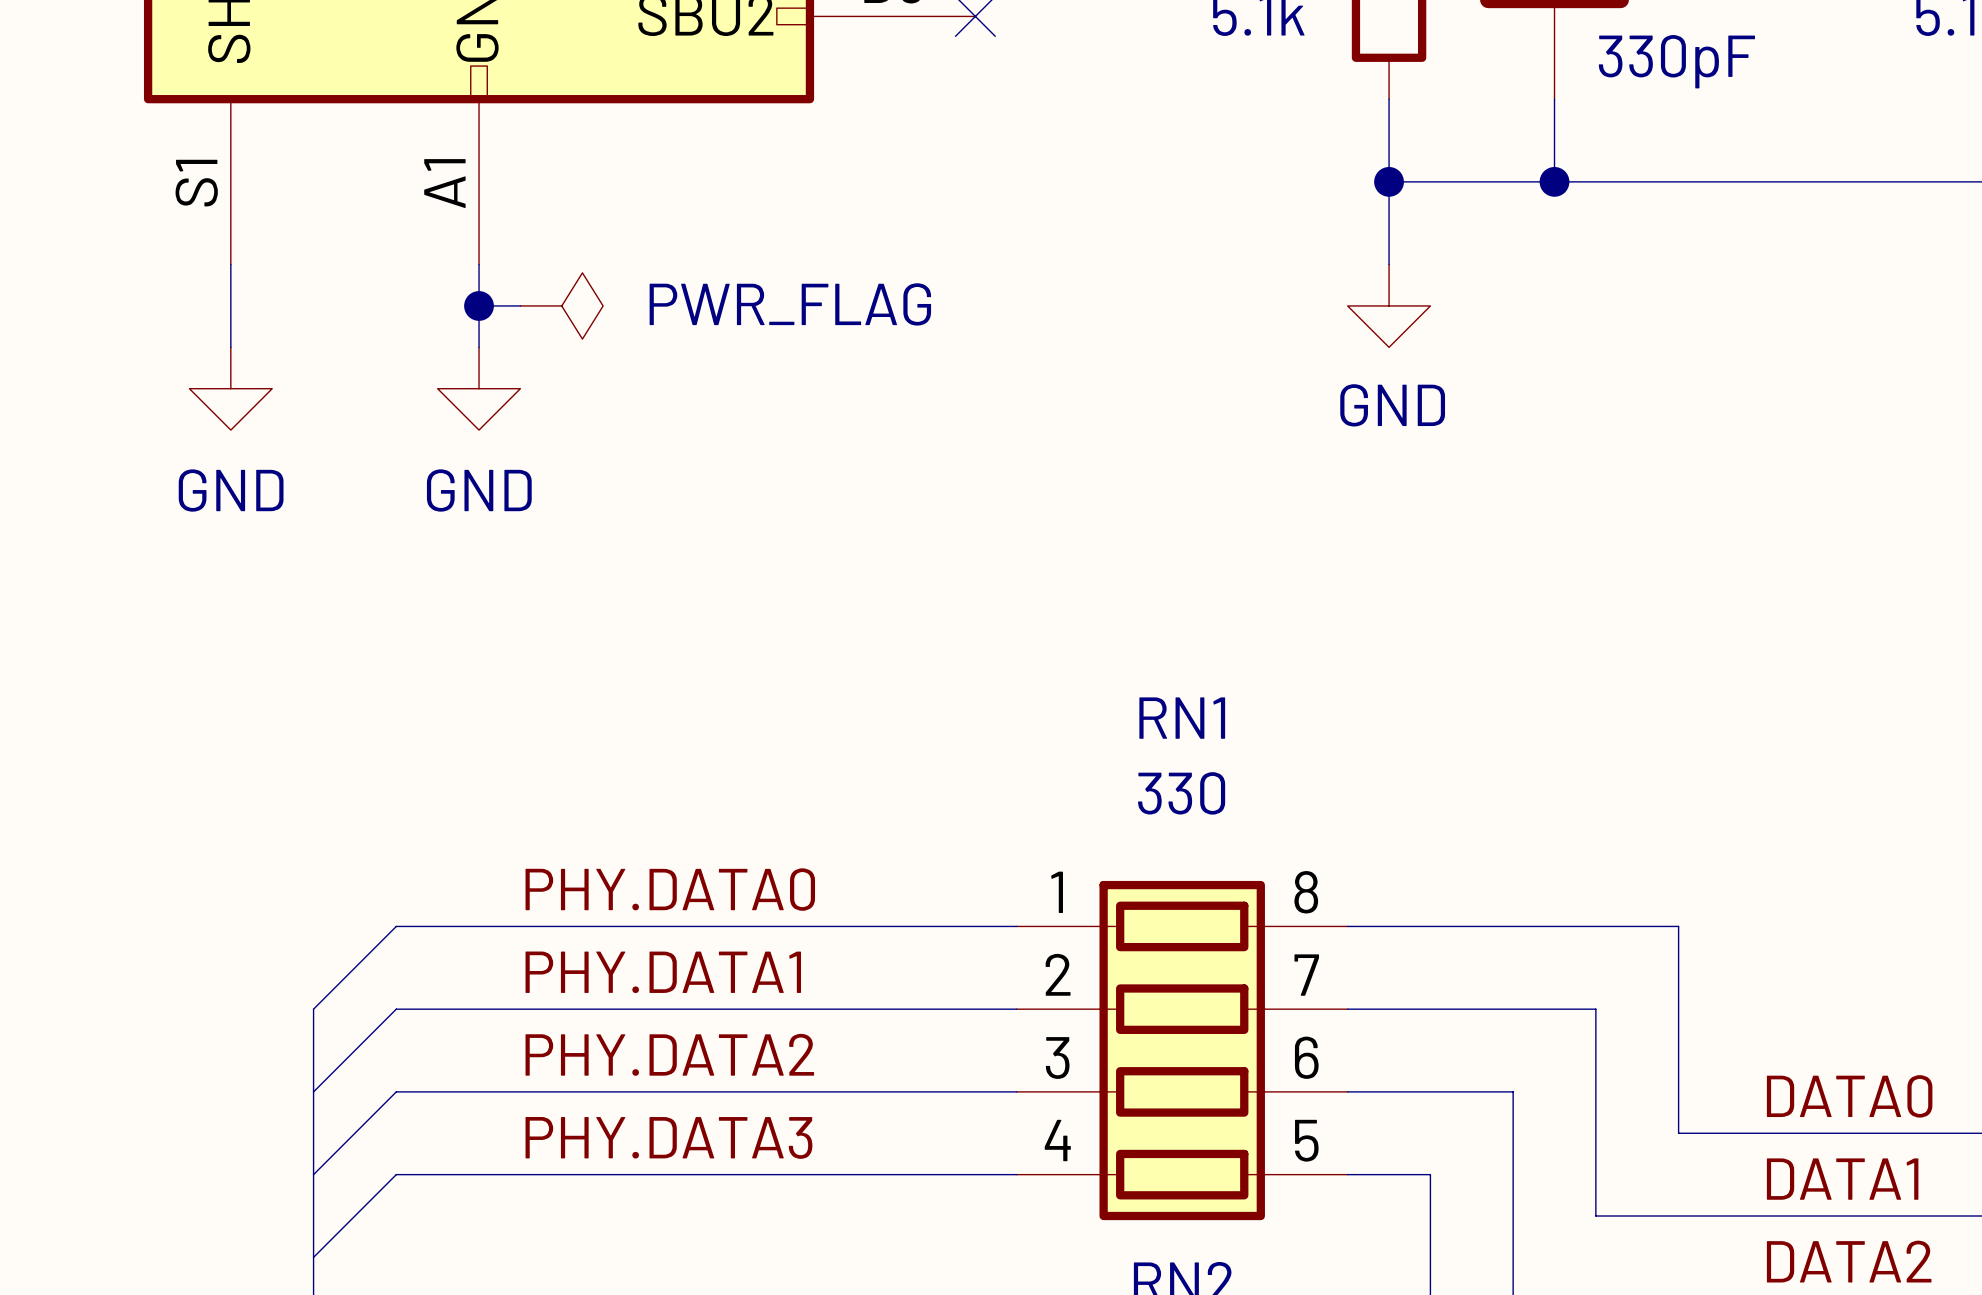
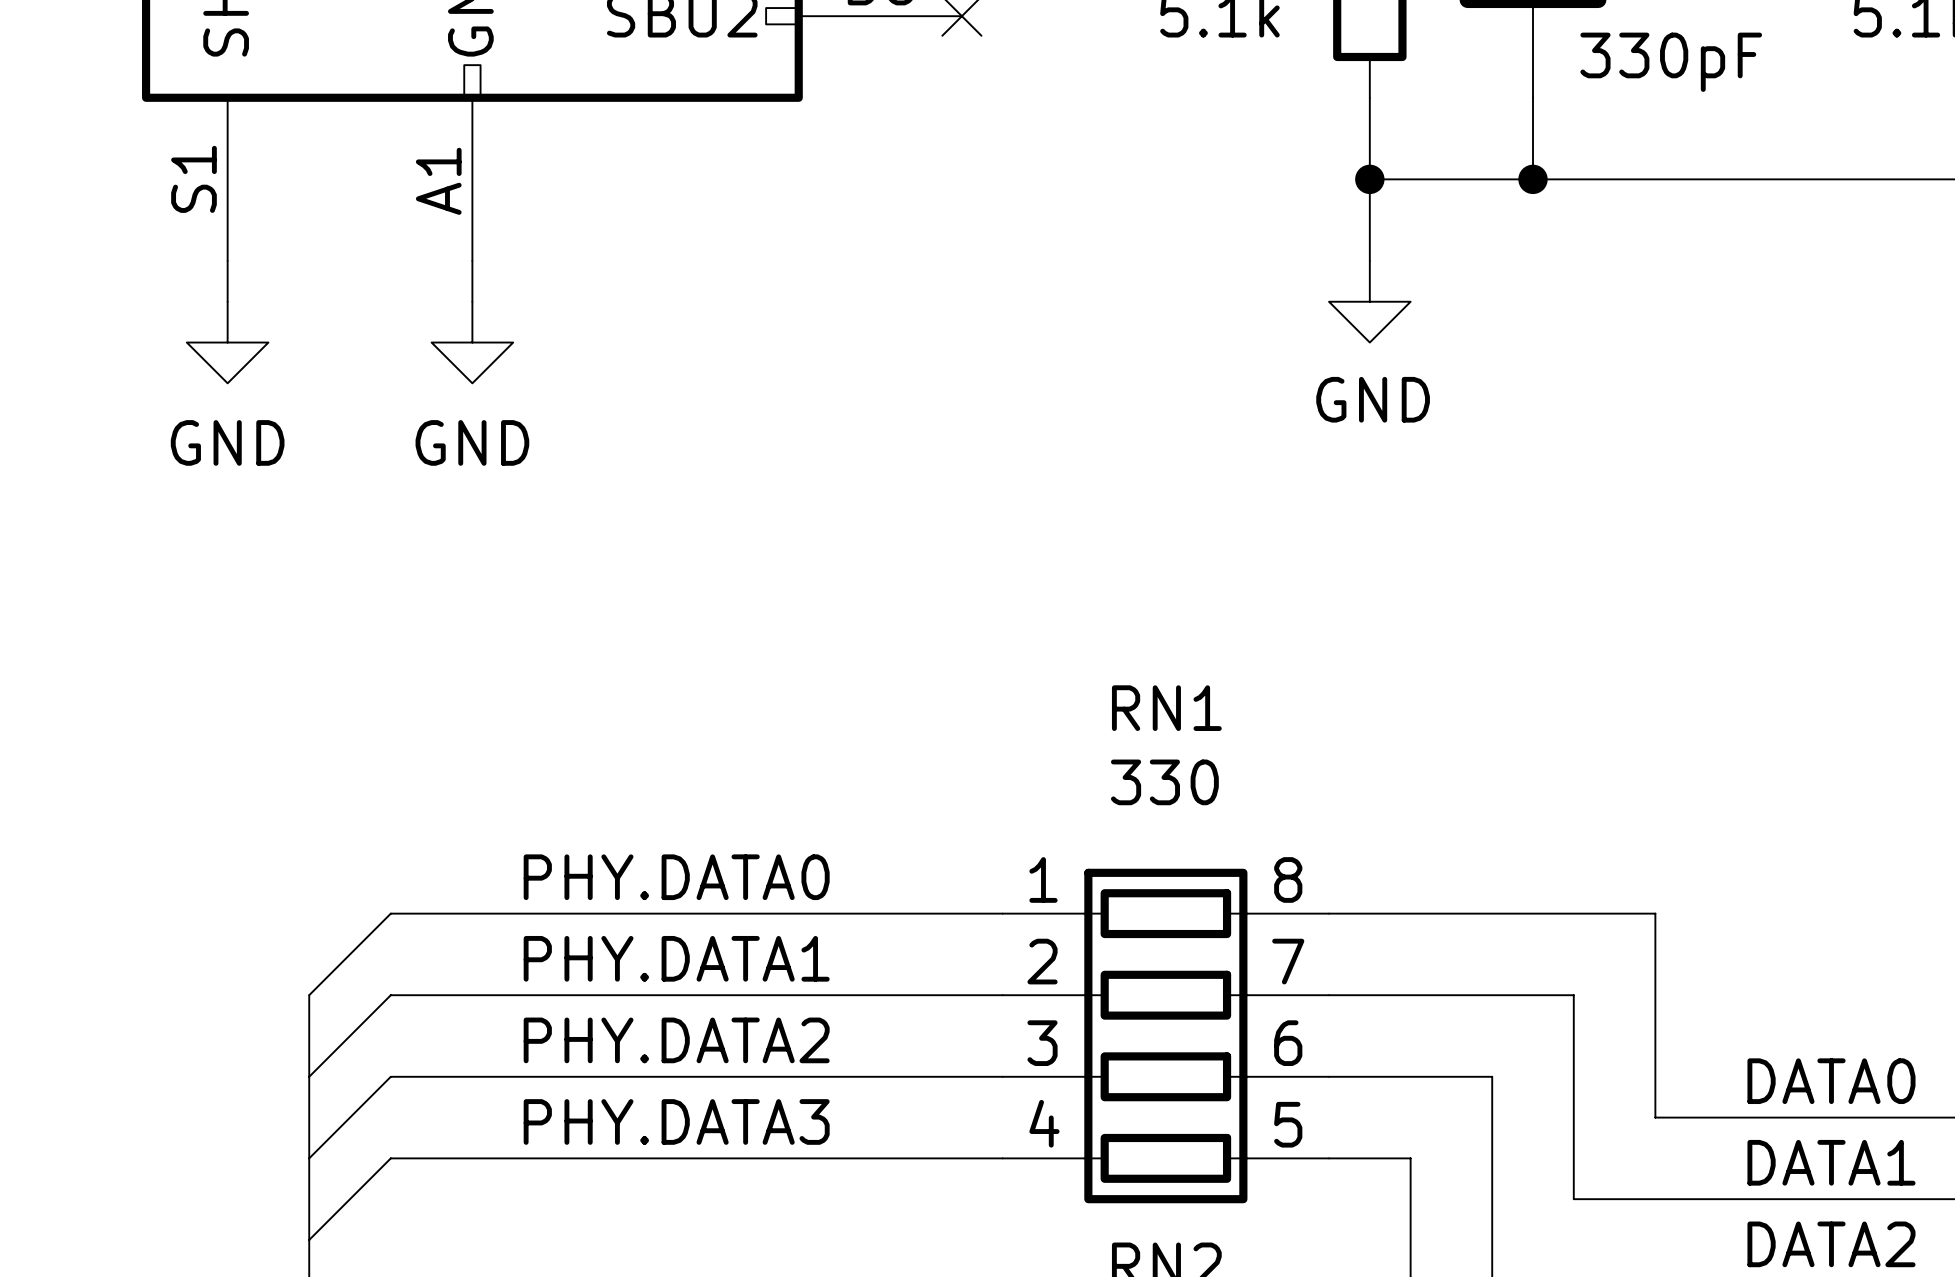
junction: (479, 305) -> none
wire: (520, 305) (479, 305) (479, 347) -> none
power symbol: PWR_FLAG (561, 305) -> none
power symbol position: GND (230, 388) -> GND (227, 342)
power symbol position: GND (479, 388) -> GND (472, 342)

